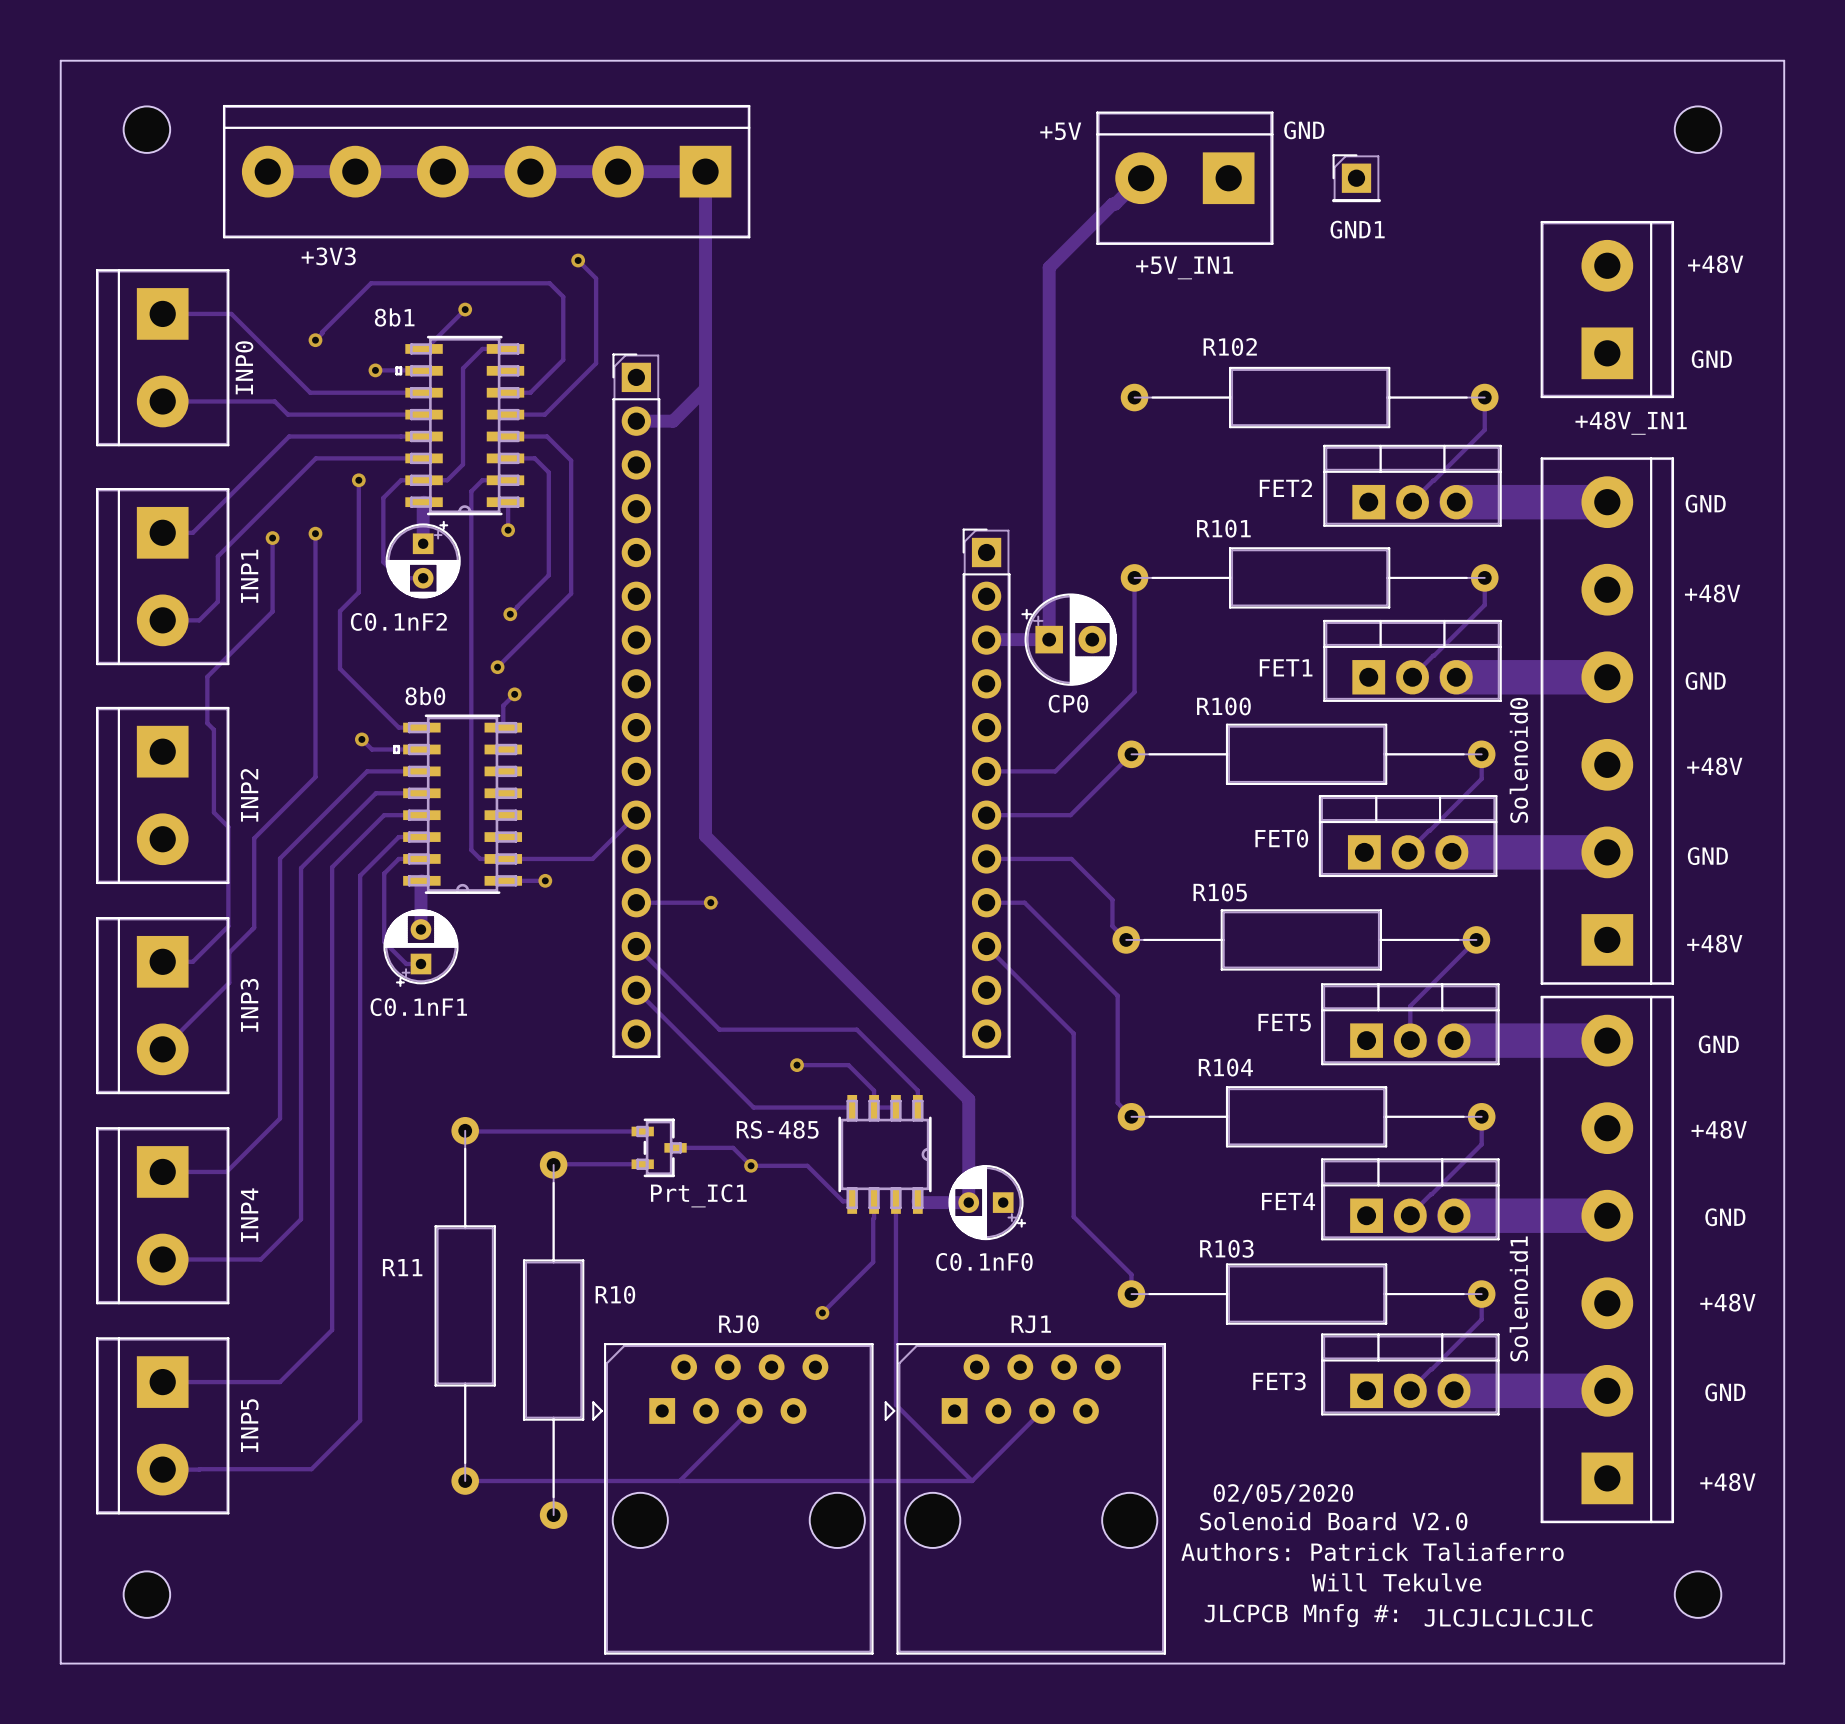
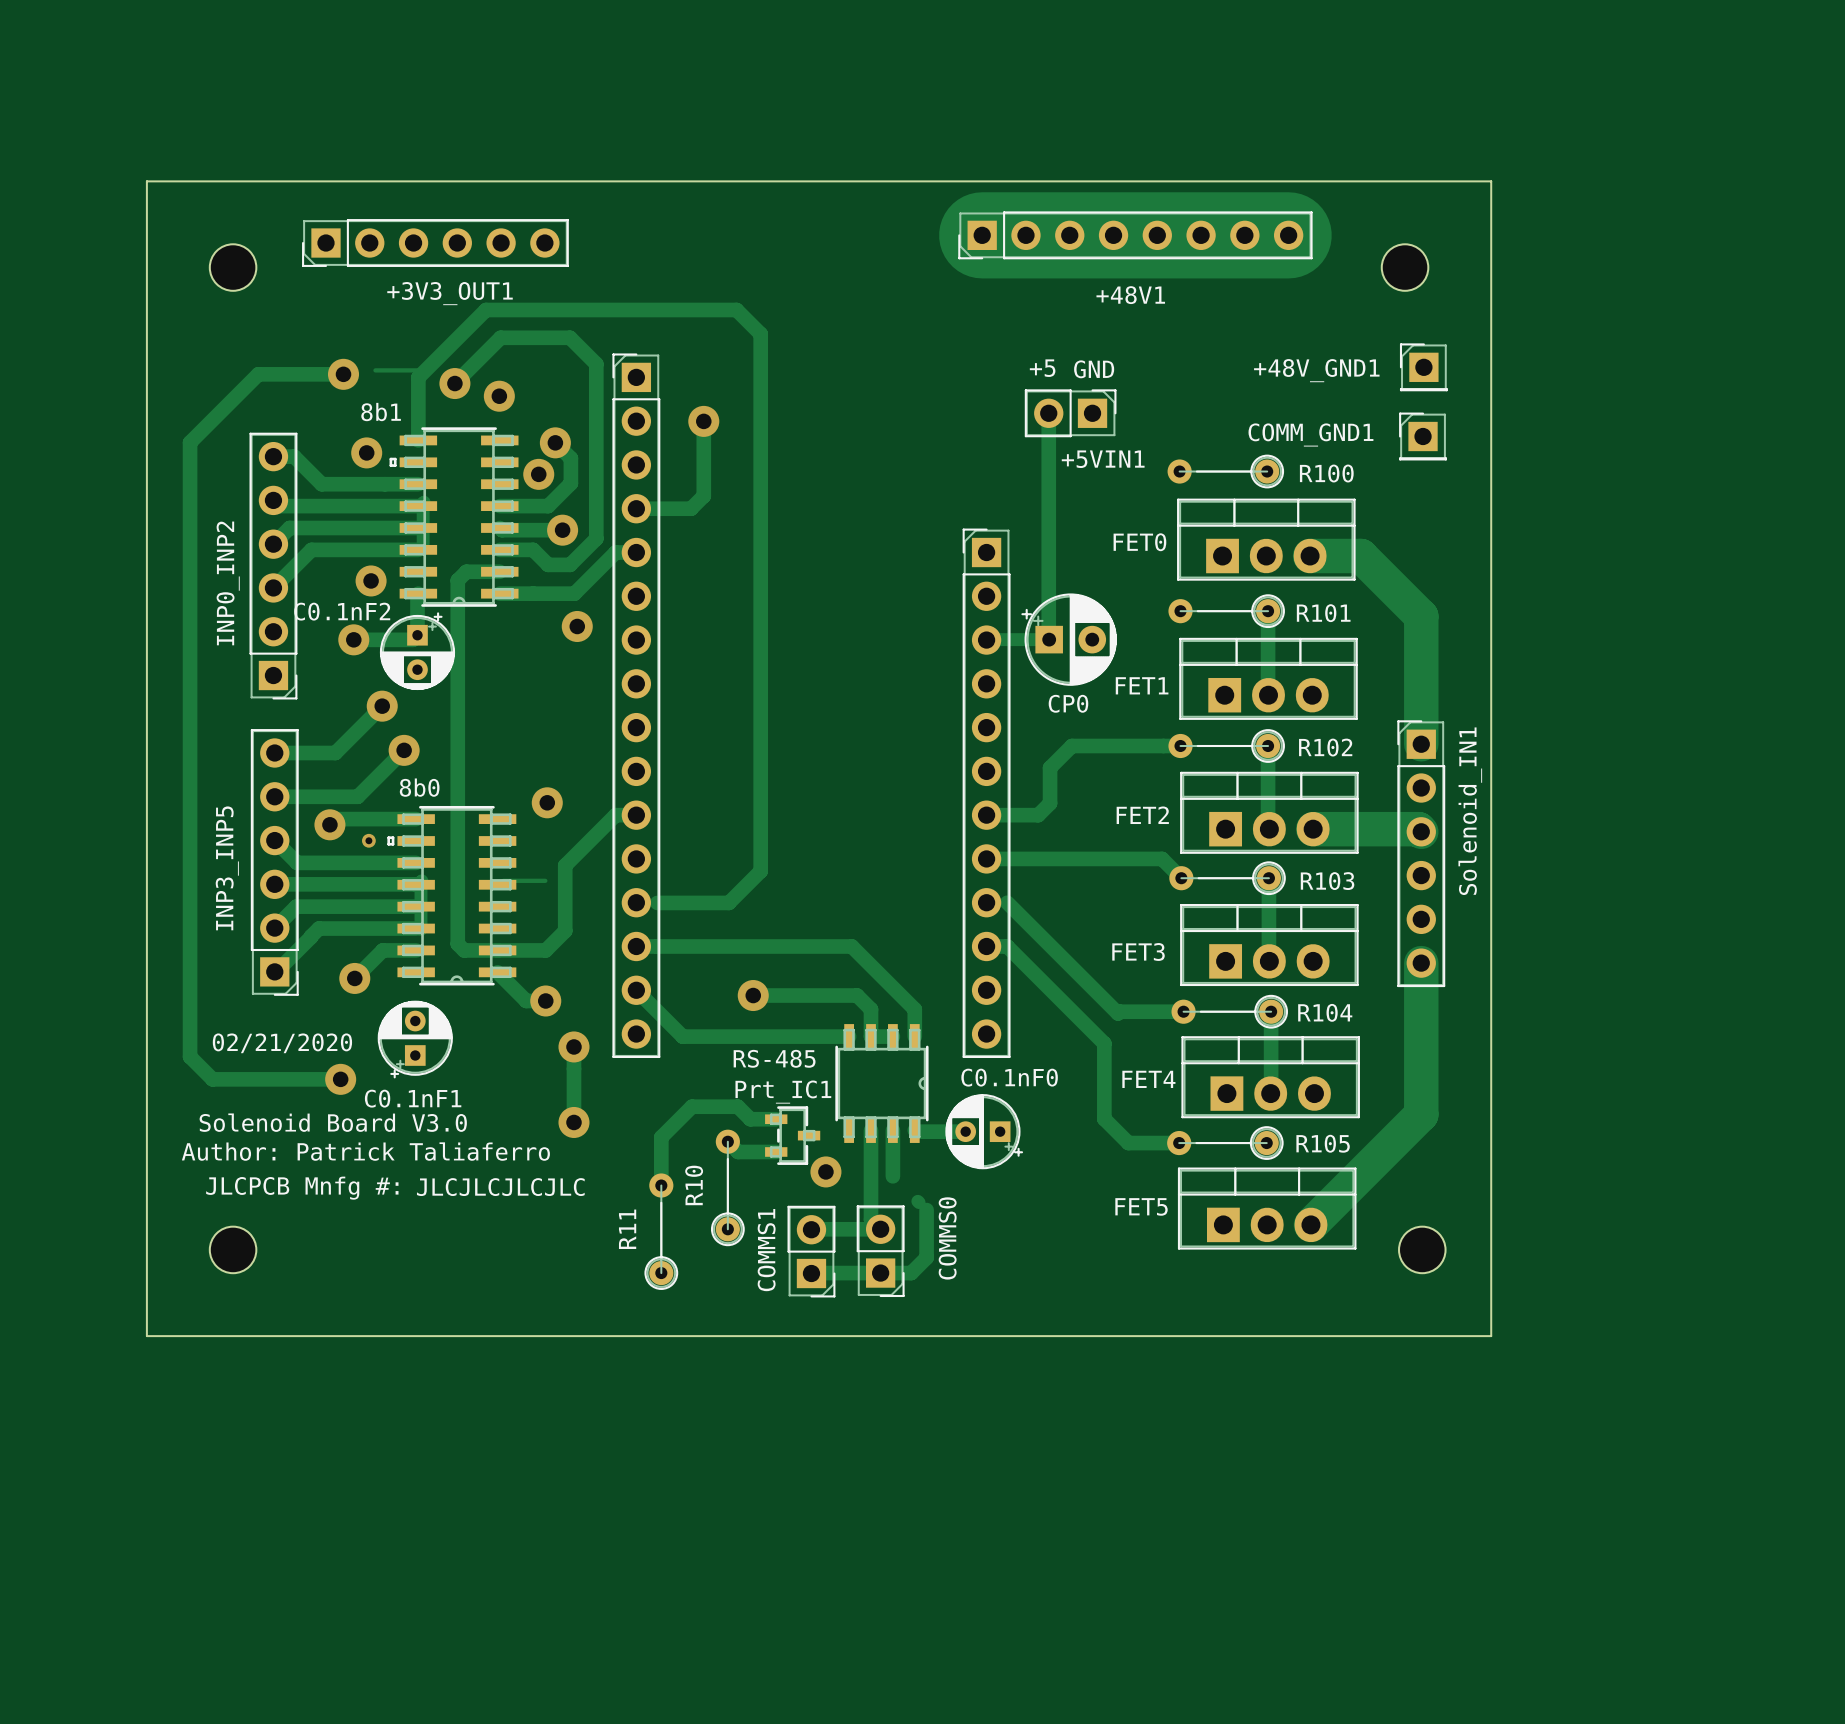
board edge: (60, 60) (1784, 60) (1784, 1663) (60, 1663) (60, 60) -> (146, 181) (146, 1336) (1491, 1336) (1491, 181) (146, 181)
part position: (146, 129) -> (233, 267)
part position: (1698, 129) -> (1405, 267)
text: GND (1304, 130) -> none
text: +5V (1060, 131) -> none
track: (267, 171) (705, 171) (705, 836) (968, 1099) (968, 1202) (919, 1202) -> none
+3V3: (486, 171) -> none
track: (1141, 178) (1049, 267) (1049, 639) -> (1048, 413) (1049, 639)
+5V_IN1: (1184, 178) -> none
GND1: (1356, 178) -> none
track: none -> (982, 235) (1288, 235)
+48V1: none -> (1135, 235)
+3V3_OUT1: none -> (435, 243)
track: (578, 260) (596, 278) (596, 363) (544, 414) (505, 414) -> none
via: (578, 260) -> none
text: +48V (1715, 264) -> none
track: (465, 309) (424, 348) -> none
via: (465, 309) -> none
+48V_IN1: (1607, 309) -> none
track: (162, 313) (231, 313) (310, 392) (424, 392) -> none
8b1 name position: 8b1 (394, 317) -> 8b1 (381, 412)
track: (315, 340) (371, 283) (549, 283) (563, 296) (563, 359) (530, 392) (505, 392) -> none
via: (315, 340) -> none
R102 name position: R102 (1230, 347) -> R102 (1325, 747)
track: (505, 348) (482, 348) (463, 368) (463, 464) (447, 480) (401, 480) (383, 497) (383, 562) (399, 578) (423, 578) -> none
INP0: (162, 357) -> none
text: GND (1711, 359) -> none
R102 footprint: [1120, 366, 1499, 429] -> [1168, 729, 1285, 763]
+48V_GND1: none -> (1423, 367)
text: none -> +5 (1042, 368)
text: none -> GND (1094, 369)
via: (375, 370) -> none
track: none -> (343, 374) (258, 374) (190, 442) (190, 1056) (212, 1079) (340, 1079)
via: none -> (343, 374)
track: none -> (454, 383) (500, 337) (570, 337) (596, 364) (596, 538) (570, 564) (548, 564) (533, 549) (499, 549)
via: none -> (454, 383)
track: (705, 388) (673, 421) (636, 421) -> none
via: none -> (499, 396)
track: (1484, 397) (1484, 429) (1412, 502) -> none
track: (162, 401) (274, 401) (287, 414) (424, 414) -> none
+5VIN1: none -> (1070, 413)
track: none -> (703, 421) (703, 496) (691, 508) (636, 508)
via: none -> (703, 421)
8b1 position: (459, 425) -> (454, 517)
track: (424, 436) (289, 436) (192, 532) (162, 532) -> none
track: (505, 436) (547, 436) (571, 460) (571, 593) (497, 667) -> none
COMM_GND1: none -> (1423, 436)
track: none -> (555, 442) (570, 458) (570, 483) (548, 506) (499, 506)
via: none -> (555, 442)
via: none -> (366, 452)
track: none -> (273, 456) (294, 456) (321, 484) (418, 484)
track: (424, 458) (315, 458) (217, 556) (217, 601) (199, 620) (162, 620) -> none
track: (505, 458) (534, 458) (548, 472) (548, 575) (510, 614) -> none
via: none -> (538, 474)
track: (358, 480) (358, 592) (340, 611) (340, 668) (398, 727) (421, 727) -> none
via: (358, 480) -> none
track: (505, 480) (482, 480) (471, 491) (471, 850) (480, 858) (592, 858) (636, 815) -> (499, 571) (466, 571) (457, 580) (457, 943) (464, 950) (545, 950) (565, 930) (565, 865) (615, 815) (636, 815)
FET2 position: (1412, 485) -> (1269, 812)
track: none -> (273, 500) (279, 506) (418, 506)
track: (505, 502) (508, 504) (508, 530) -> none
track: (1456, 502) (1607, 502) -> none
text: GND (1705, 503) -> none
track: none -> (418, 527) (289, 527) (273, 544)
track: none -> (499, 527) (501, 530) (562, 530)
R101 name position: R101 (1223, 528) -> R101 (1323, 613)
via: (508, 530) -> none
via: none -> (562, 530)
track: (315, 533) (315, 777) (254, 838) (254, 927) (229, 952) (229, 982) (162, 1049) -> none
via: (315, 533) -> none
track: (272, 535) (272, 611) (207, 676) (207, 723) (213, 729) (213, 812) (228, 826) (228, 926) (192, 961) (162, 961) -> none
via: (272, 538) -> none
R101 footprint: [1120, 547, 1499, 609] -> [1168, 594, 1285, 629]
track: none -> (418, 549) (311, 549) (273, 587)
track: none -> (636, 552) (615, 552) (574, 593) (499, 593)
track: none -> (1310, 556) (1360, 556) (1421, 616) (1421, 744)
C0.1nF2 position: (423, 559) -> (417, 651)
INP0_INP2: none -> (273, 566)
INP1: (162, 576) -> none
track: (1134, 577) (1134, 692) (1055, 771) (986, 771) -> none
track: (1484, 577) (1484, 605) (1412, 677) -> none
via: none -> (371, 580)
track: none -> (418, 593) (417, 635) (412, 639) (352, 638)
text: +48V (1712, 593) -> none
track: none -> (1268, 611) (1268, 695)
via: (510, 614) -> none
C0.1nF2 name position: C0.1nF2 (398, 621) -> C0.1nF2 (342, 611)
via: none -> (577, 626)
via: none -> (353, 639)
FET1 position: (1412, 660) -> (1268, 678)
via: (497, 667) -> none
track: (1456, 677) (1607, 677) -> none
text: GND (1705, 681) -> none
track: (514, 694) (503, 705) (503, 727) -> none
via: (514, 694) -> none
track: none -> (382, 706) (335, 753) (274, 753)
via: none -> (382, 706)
R100 name position: R100 (1223, 706) -> R100 (1326, 473)
Solenoid0: (1607, 721) -> none
R100 footprint: [1117, 723, 1496, 785] -> [1167, 454, 1285, 489]
track: (361, 739) (371, 749) (421, 749) -> none
via: (361, 739) -> none
track: none -> (1268, 746) (1269, 829)
track: none -> (404, 750) (357, 796) (274, 796)
via: none -> (404, 750)
track: (1131, 754) (1070, 815) (1038, 815) -> (1180, 746) (1071, 746) (1050, 767) (1050, 803) (1038, 815)
track: (1481, 754) (1481, 778) (1408, 852) -> none
text: +48V (1714, 766) -> none
track: (421, 771) (367, 771) (280, 858) (280, 1118) (226, 1171) (162, 1171) -> none
track: (421, 793) (375, 793) (301, 868) (301, 1219) (260, 1259) (162, 1259) -> none
INP2: (162, 795) -> none
via: none -> (547, 802)
8b0 position: (457, 804) -> (451, 895)
track: (421, 815) (384, 815) (332, 867) (332, 1329) (280, 1382) (162, 1382) -> none
track width: thin (986, 815) (1038, 815) -> thick (986, 815) (1038, 815)
track: none -> (416, 819) (335, 819) (329, 824)
via: none -> (329, 824)
track: none -> (1313, 829) (1418, 829) (1421, 831)
FET0 position: (1408, 836) -> (1266, 539)
track: (421, 837) (398, 837) (360, 875) (360, 1420) (311, 1469) (162, 1469) -> none
track: none -> (274, 840) (297, 862) (416, 862)
via: none -> (368, 840)
track: (1451, 852) (1607, 852) -> none
Solenoid_IN1: none -> (1421, 853)
text: GND (1707, 856) -> none
track: (421, 858) (398, 858) (384, 873) (384, 941) (406, 964) (420, 964) -> none
track width: thin (986, 858) (1071, 858) -> thick (986, 858) (1071, 858)
track: (1071, 858) (1112, 899) (1112, 926) (1126, 939) -> (1071, 858) (1162, 858) (1181, 878)
INP3_INP5: none -> (274, 862)
track: none -> (1268, 878) (1269, 961)
via: (545, 880) -> none
track: none -> (274, 884) (416, 884)
R105 name position: R105 (1220, 892) -> R105 (1323, 1143)
track: (657, 902) (716, 902) -> (657, 902) (728, 902) (760, 871) (760, 334) (736, 309) (485, 309) (418, 377) (418, 440)
via: (710, 902) -> none
track: (1007, 902) (1024, 902) (1117, 995) (1117, 1103) (1131, 1116) -> (1007, 902) (1118, 1013) (1119, 1011) (1183, 1011)
track: none -> (416, 906) (296, 906) (274, 928)
R105 footprint: [1112, 909, 1491, 971] -> [1167, 1126, 1284, 1160]
track: none -> (416, 928) (318, 928) (274, 971)
track: (1476, 939) (1410, 1006) (1410, 1040) -> none
text: +48V (1714, 943) -> none
track: (636, 946) (719, 1029) (856, 1029) (917, 1090) (917, 1107) -> (636, 946) (851, 946) (914, 1009) (914, 1036)
track: (986, 946) (1073, 1033) (1073, 1216) (1131, 1274) (1131, 1294) -> (986, 946) (1007, 946) (1104, 1043) (1104, 1118) (1128, 1143) (1179, 1143)
C0.1nF1 position: (420, 948) -> (415, 1039)
track: none -> (416, 950) (382, 950) (354, 978)
track: none -> (1421, 963) (1421, 1114) (1310, 1224)
track: none -> (497, 972) (526, 1001) (545, 1001)
via: none -> (354, 978)
track width: thin (636, 990) (682, 1036) -> thick (636, 990) (682, 1036)
track: none -> (753, 995) (857, 995) (871, 1009) (871, 1036) (892, 1036)
via: none -> (753, 995)
via: none -> (545, 1001)
INP3: (162, 1005) -> none
track: none -> (1271, 1011) (1270, 1093)
FET5 position: (1410, 1024) -> (1267, 1208)
track: (682, 1036) (753, 1107) (852, 1107) -> (682, 1036) (849, 1036)
track: (1454, 1040) (1607, 1040) -> none
text: none -> 02/21/2020 (282, 1043)
text: GND (1718, 1044) -> none
track: none -> (573, 1046) (573, 1122)
via: none -> (573, 1046)
track: (797, 1065) (848, 1065) (874, 1090) (874, 1107) (895, 1107) -> none
via: (797, 1065) -> none
R104 name position: R104 (1225, 1067) -> R104 (1325, 1012)
via: none -> (340, 1079)
R104 footprint: [1117, 1086, 1496, 1148] -> [1171, 994, 1289, 1029]
track: (1481, 1116) (1481, 1144) (1410, 1215) -> none
R11 footprint: [434, 1117, 496, 1495] -> [644, 1173, 679, 1290]
track: none -> (776, 1119) (750, 1119) (737, 1106) (691, 1106) (661, 1137) (661, 1185)
text: none -> Solenoid Board V3.0 (333, 1122)
via: none -> (573, 1122)
text: +48V (1719, 1129) -> none
track: (465, 1130) (642, 1131) -> none
track: none -> (871, 1130) (871, 1219) (880, 1229) (811, 1229)
track: none -> (892, 1130) (892, 1176)
track: none -> (914, 1130) (965, 1131)
track: none -> (727, 1141) (738, 1151) (776, 1151)
Prt_IC1 position: (659, 1147) -> (792, 1135)
track: (675, 1147) (733, 1147) (751, 1165) (807, 1165) (842, 1201) (852, 1201) -> none
text: none -> Author: Patrick Taliaferro (365, 1151)
R10 footprint: [522, 1151, 585, 1529] -> [710, 1129, 745, 1247]
RS-485 position: (885, 1154) -> (881, 1083)
track: (642, 1164) (553, 1164) -> none
via: (751, 1165) -> none
via: none -> (825, 1171)
text: none -> JLCJLCJLCJLC (500, 1187)
text: none -> JLCPCB Mnfg #: (302, 1188)
Prt_IC1 name position: Prt_IC1 (698, 1195) -> Prt_IC1 (783, 1092)
FET4 position: (1410, 1199) -> (1270, 1077)
track: (874, 1201) (873, 1262) (822, 1312) -> none
track: (895, 1201) (895, 1404) (972, 1481) -> none
C0.1nF0 position: (987, 1202) -> (984, 1131)
track: none -> (926, 1210) (926, 1257) (911, 1273) (811, 1273)
INP4: (162, 1215) -> none
track: (1454, 1215) (1607, 1215) -> none
text: GND (1725, 1217) -> none
R103 name position: R103 (1226, 1248) -> R103 (1327, 881)
part: none -> (1422, 1249)
COMMS1: none -> (811, 1251)
COMMS0: none -> (880, 1251)
Solenoid1: (1607, 1259) -> none
C0.1nF0 name position: C0.1nF0 (984, 1261) -> C0.1nF0 (1009, 1077)
R103 footprint: [1117, 1263, 1496, 1325] -> [1169, 861, 1286, 896]
R11 name position: R11 (402, 1267) -> R11 (627, 1229)
R10 name position: R10 (615, 1294) -> R10 (694, 1185)
track: (1481, 1294) (1481, 1319) (1410, 1390) -> none
text: +48V (1727, 1302) -> none
via: (822, 1312) -> none
FET3 position: (1410, 1374) -> (1269, 945)
track: (1454, 1390) (1607, 1390) -> none
text: GND (1725, 1392) -> none
track: (749, 1410) (679, 1481) -> none
track: (1042, 1410) (972, 1481) -> none
INP5: (162, 1425) -> none
track: (465, 1481) (972, 1481) -> none
text: +48V (1727, 1482) -> none
text: 02/05/2020 (1283, 1494) -> none
RJ0: (732, 1498) -> none
RJ1: (1025, 1498) -> none
text: Solenoid Board V2.0 (1333, 1521) -> none
text: Authors: Patrick Taliaferro (1372, 1551) -> none
text: Will Tekulve (1396, 1582) -> none
part position: (146, 1594) -> (233, 1249)
part: (1698, 1594) -> none
text: JLCPCB Mnfg #: (1300, 1615) -> none
text: JLCJLCJLCJLC (1508, 1617) -> none

